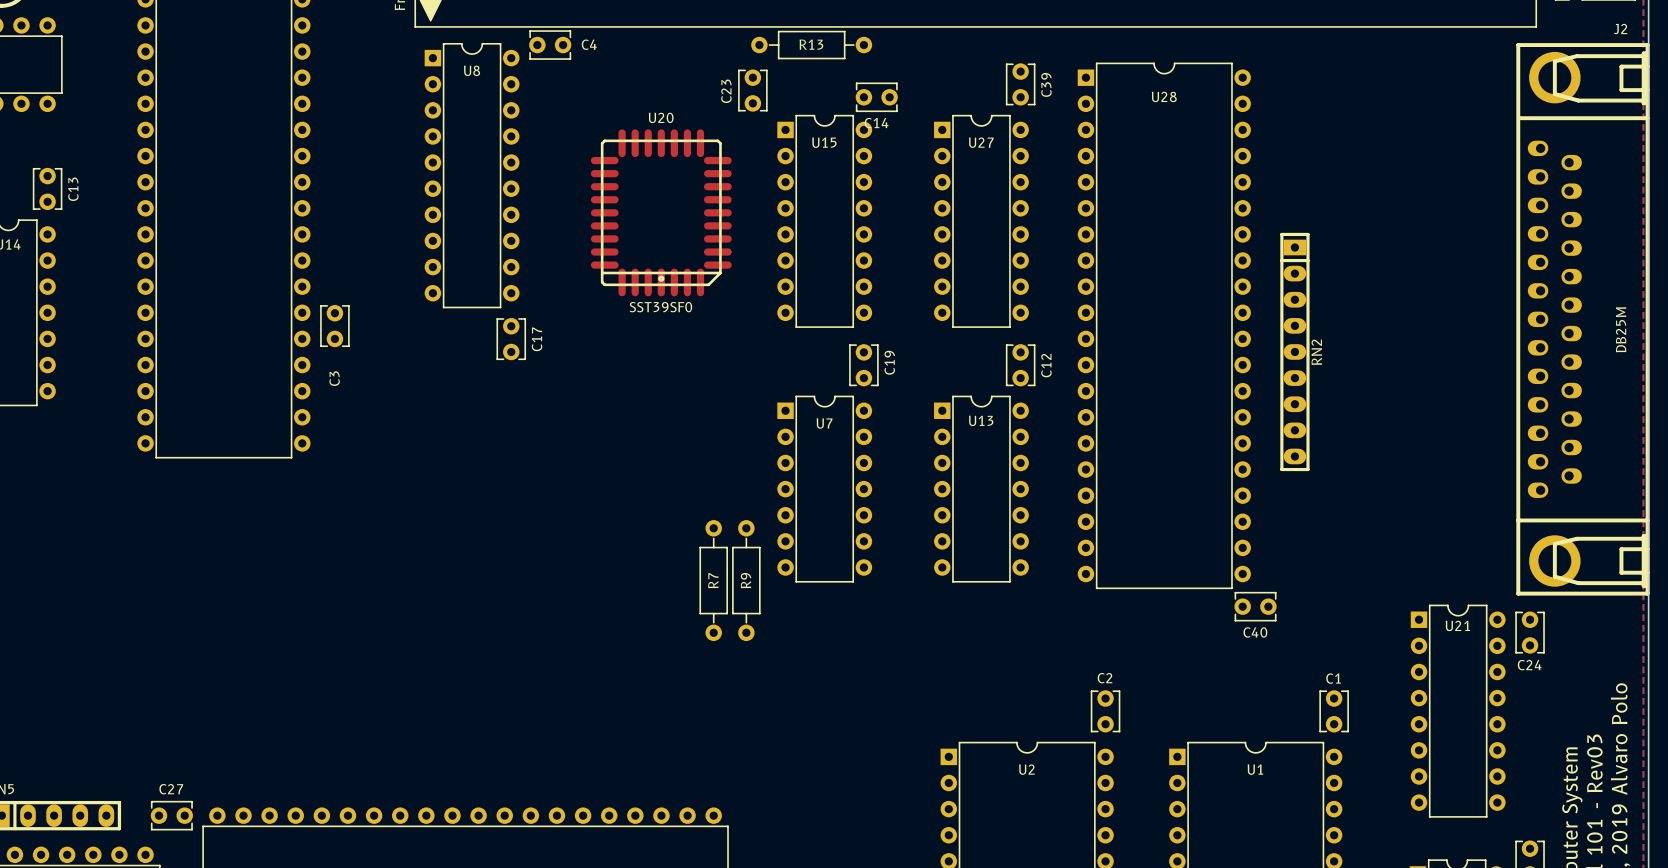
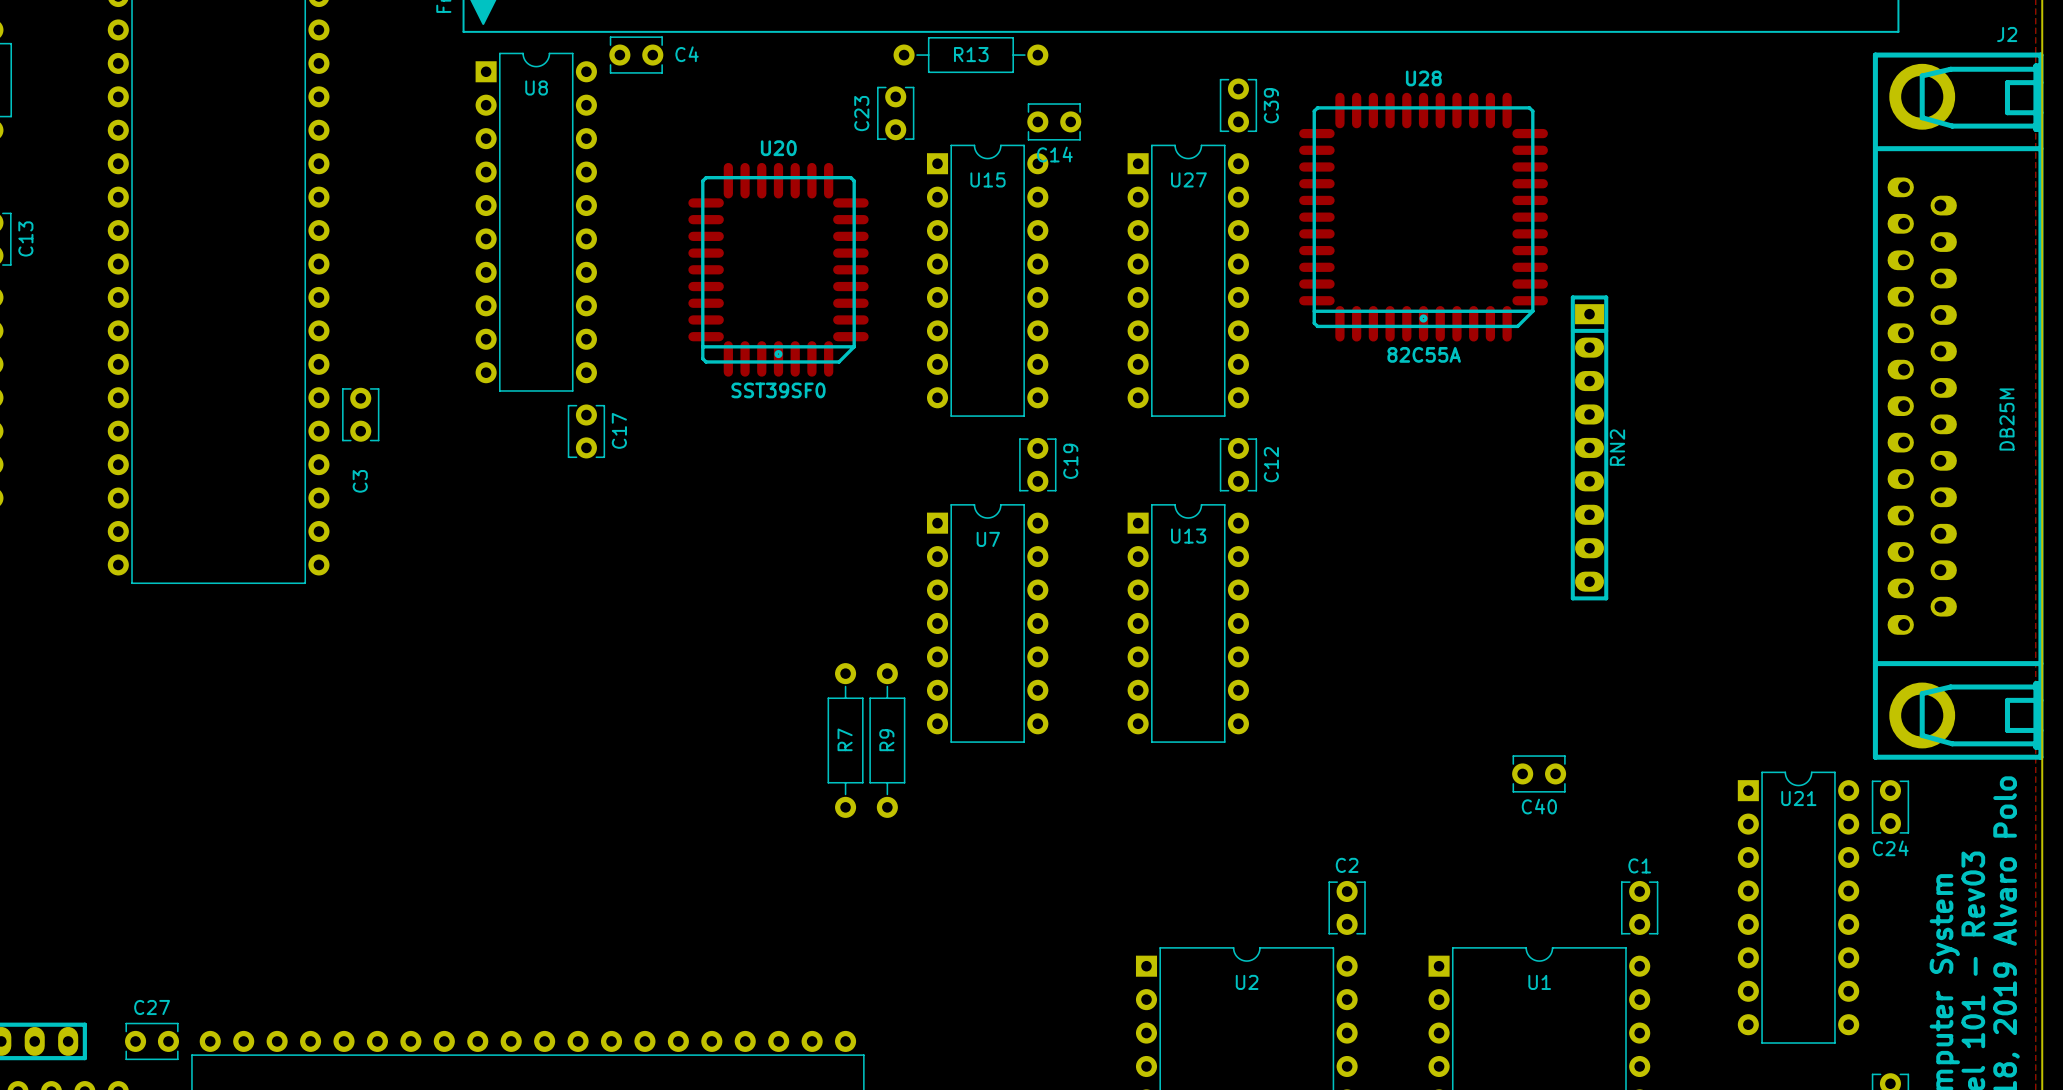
U28 footprint: [1077, 62, 1251, 589] -> [1299, 92, 1548, 342]
U28 name position: U28 (1164, 96) -> U28 (1423, 78)
U28 value: none -> 82C55A (1424, 354)

